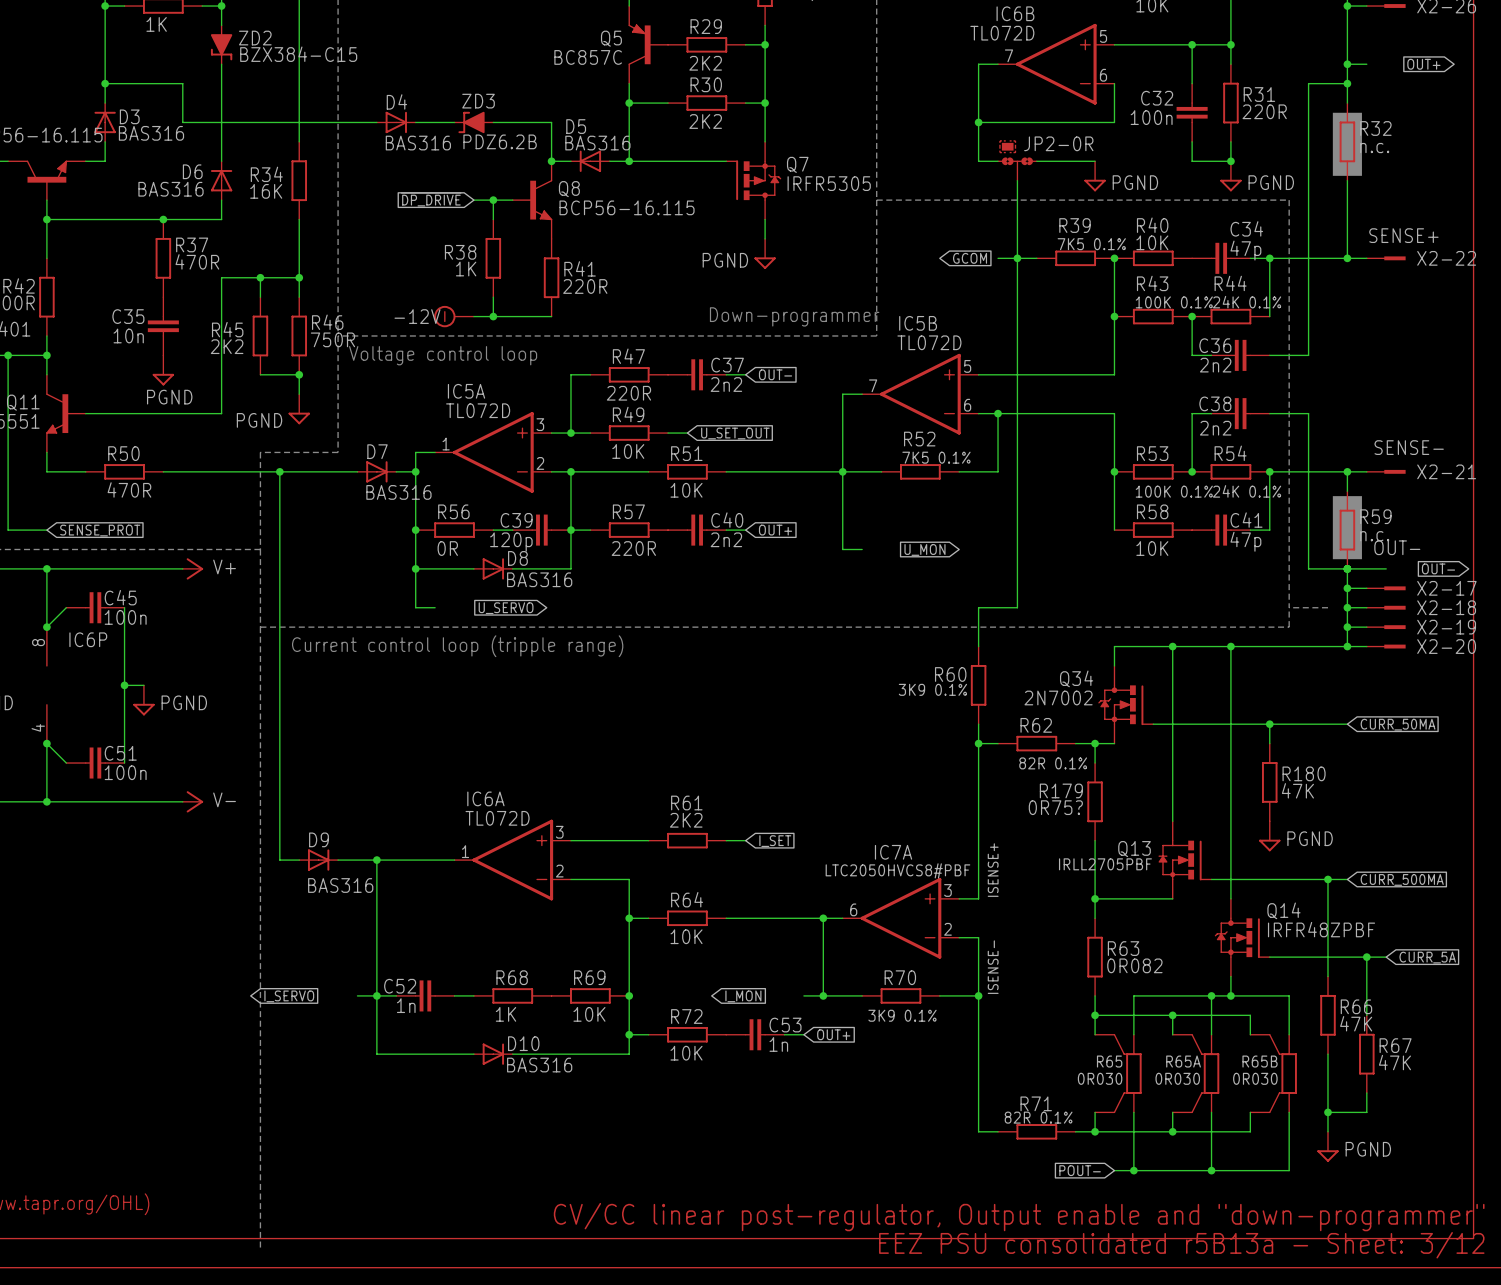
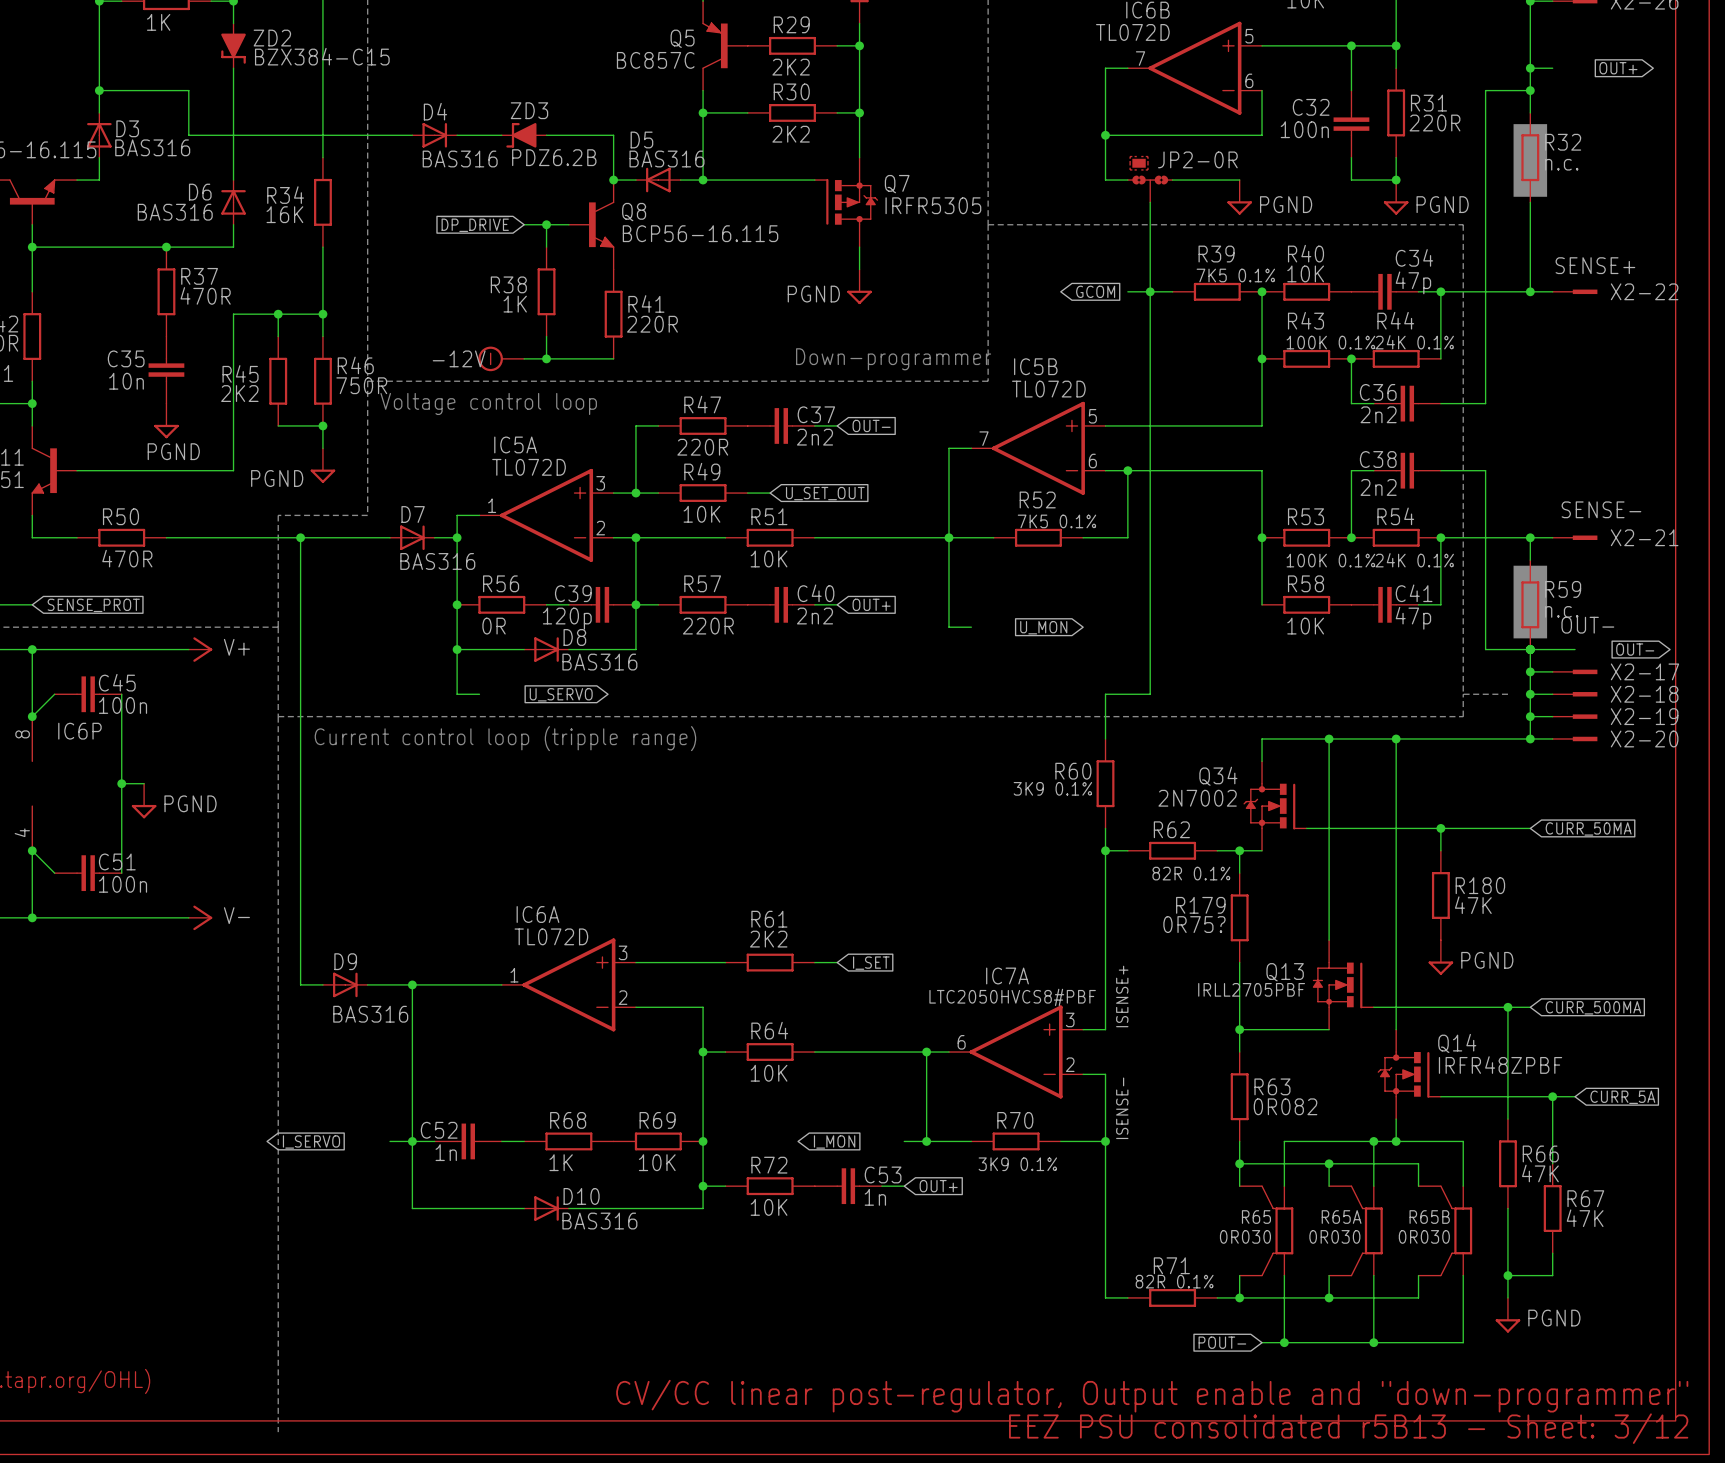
text: EEZ PSU consolidated r5B13a - Sheet: 3/12 (1181, 1245) -> EEZ PSU consolidated r5B13 - Sheet: 3/12 (1348, 1428)

